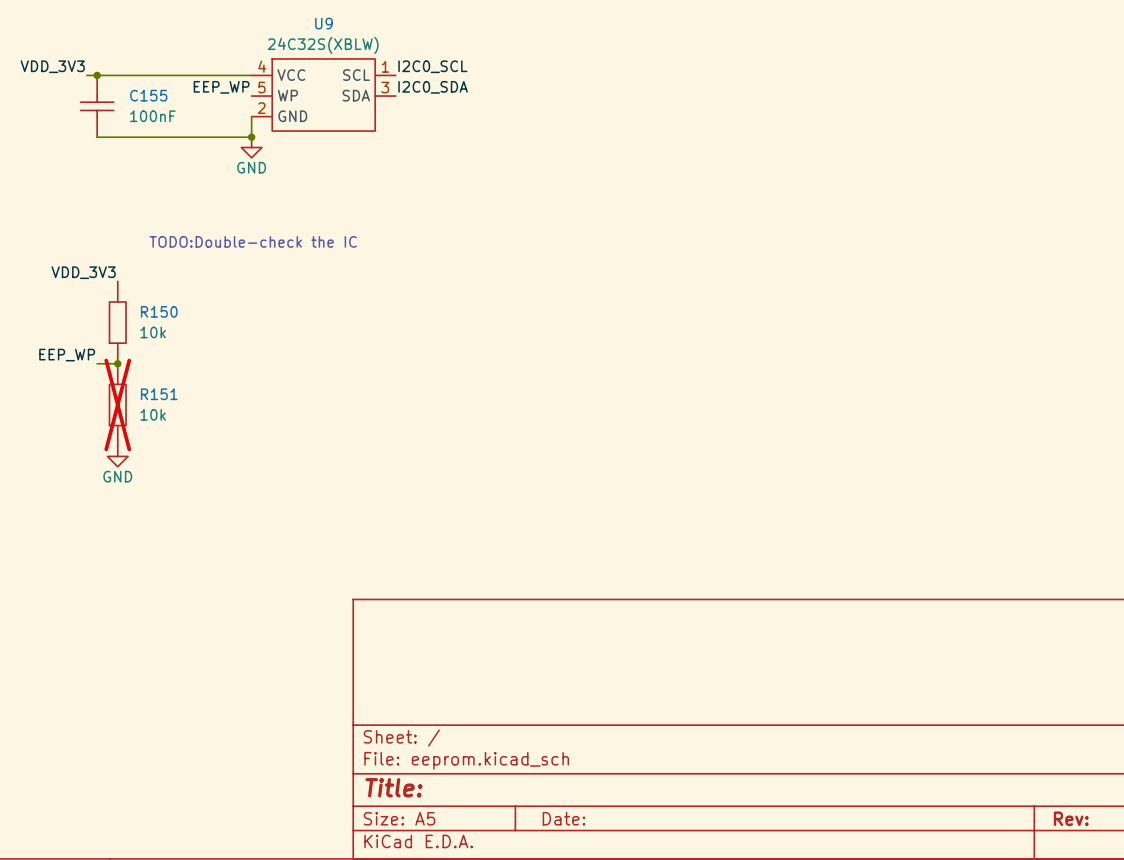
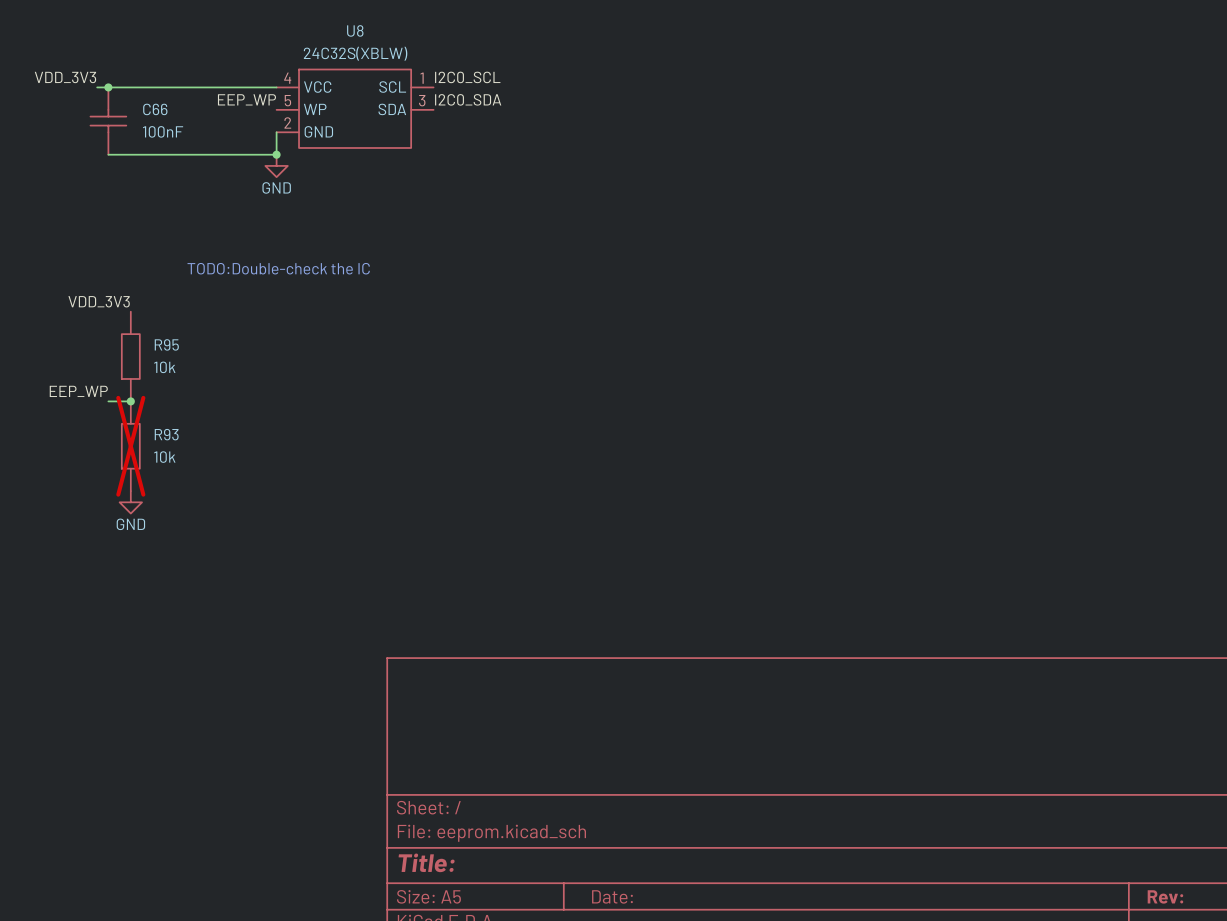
U9 name: U9 (323, 23) -> U8 (355, 30)
C155 name: C155 (148, 95) -> C66 (155, 109)
R150 name: R150 (159, 311) -> R95 (166, 344)
R151 name: R151 (159, 394) -> R93 (166, 434)

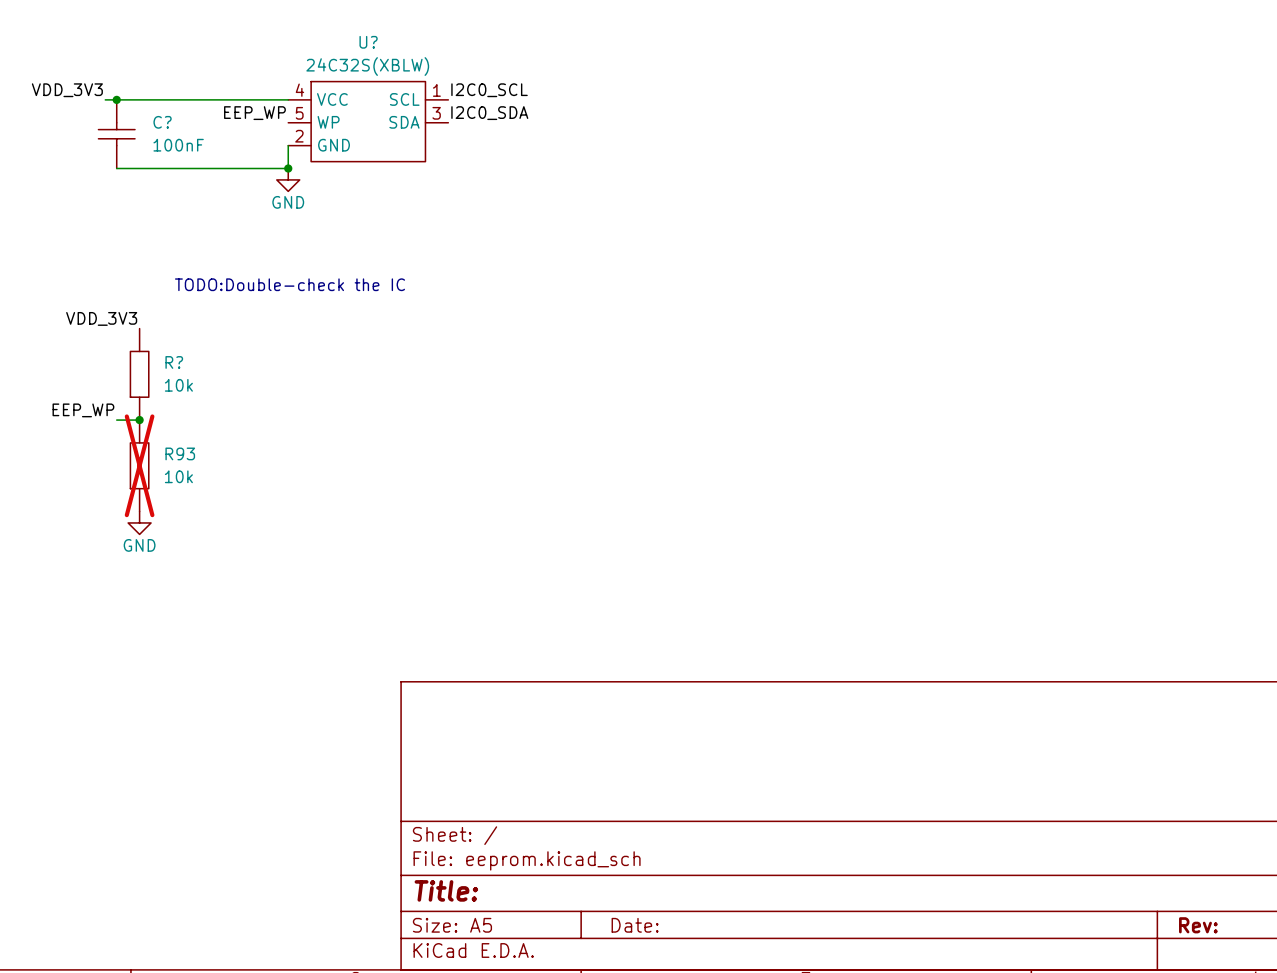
U8 name: U8 (355, 30) -> U? (368, 42)
C66 name: C66 (155, 109) -> C? (162, 122)
R95 name: R95 (166, 344) -> R? (174, 362)

